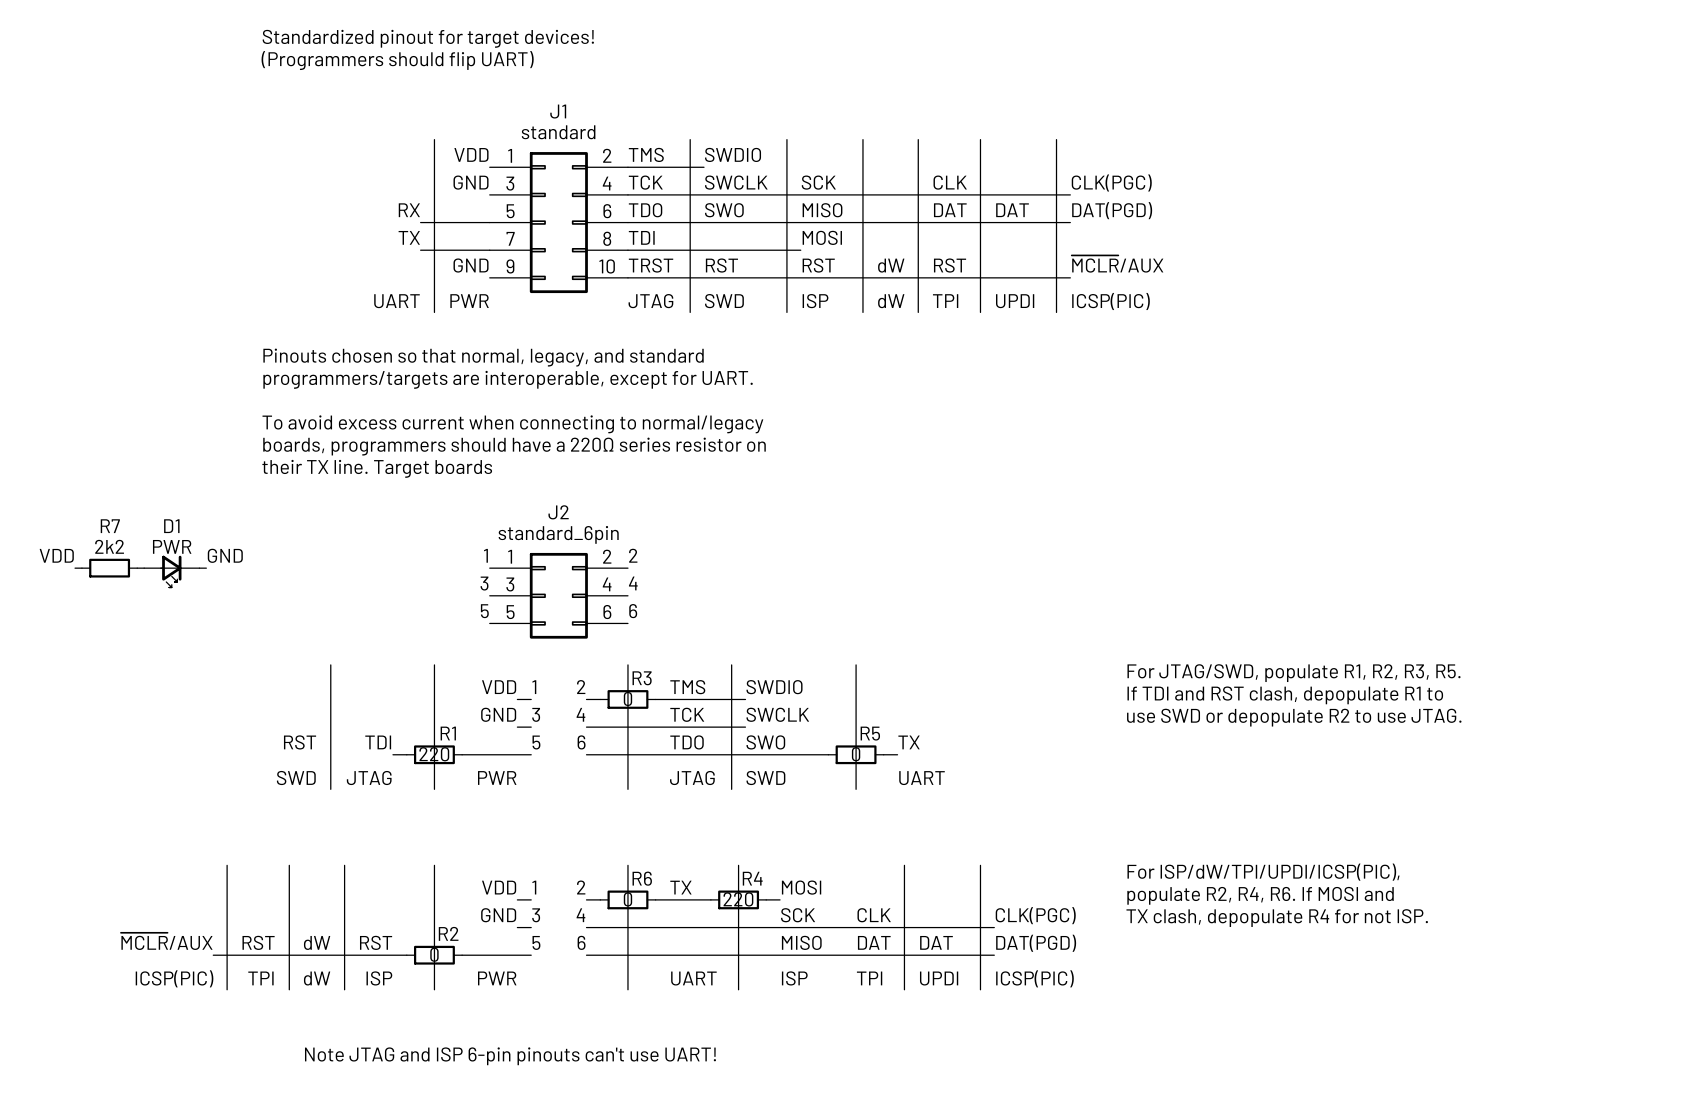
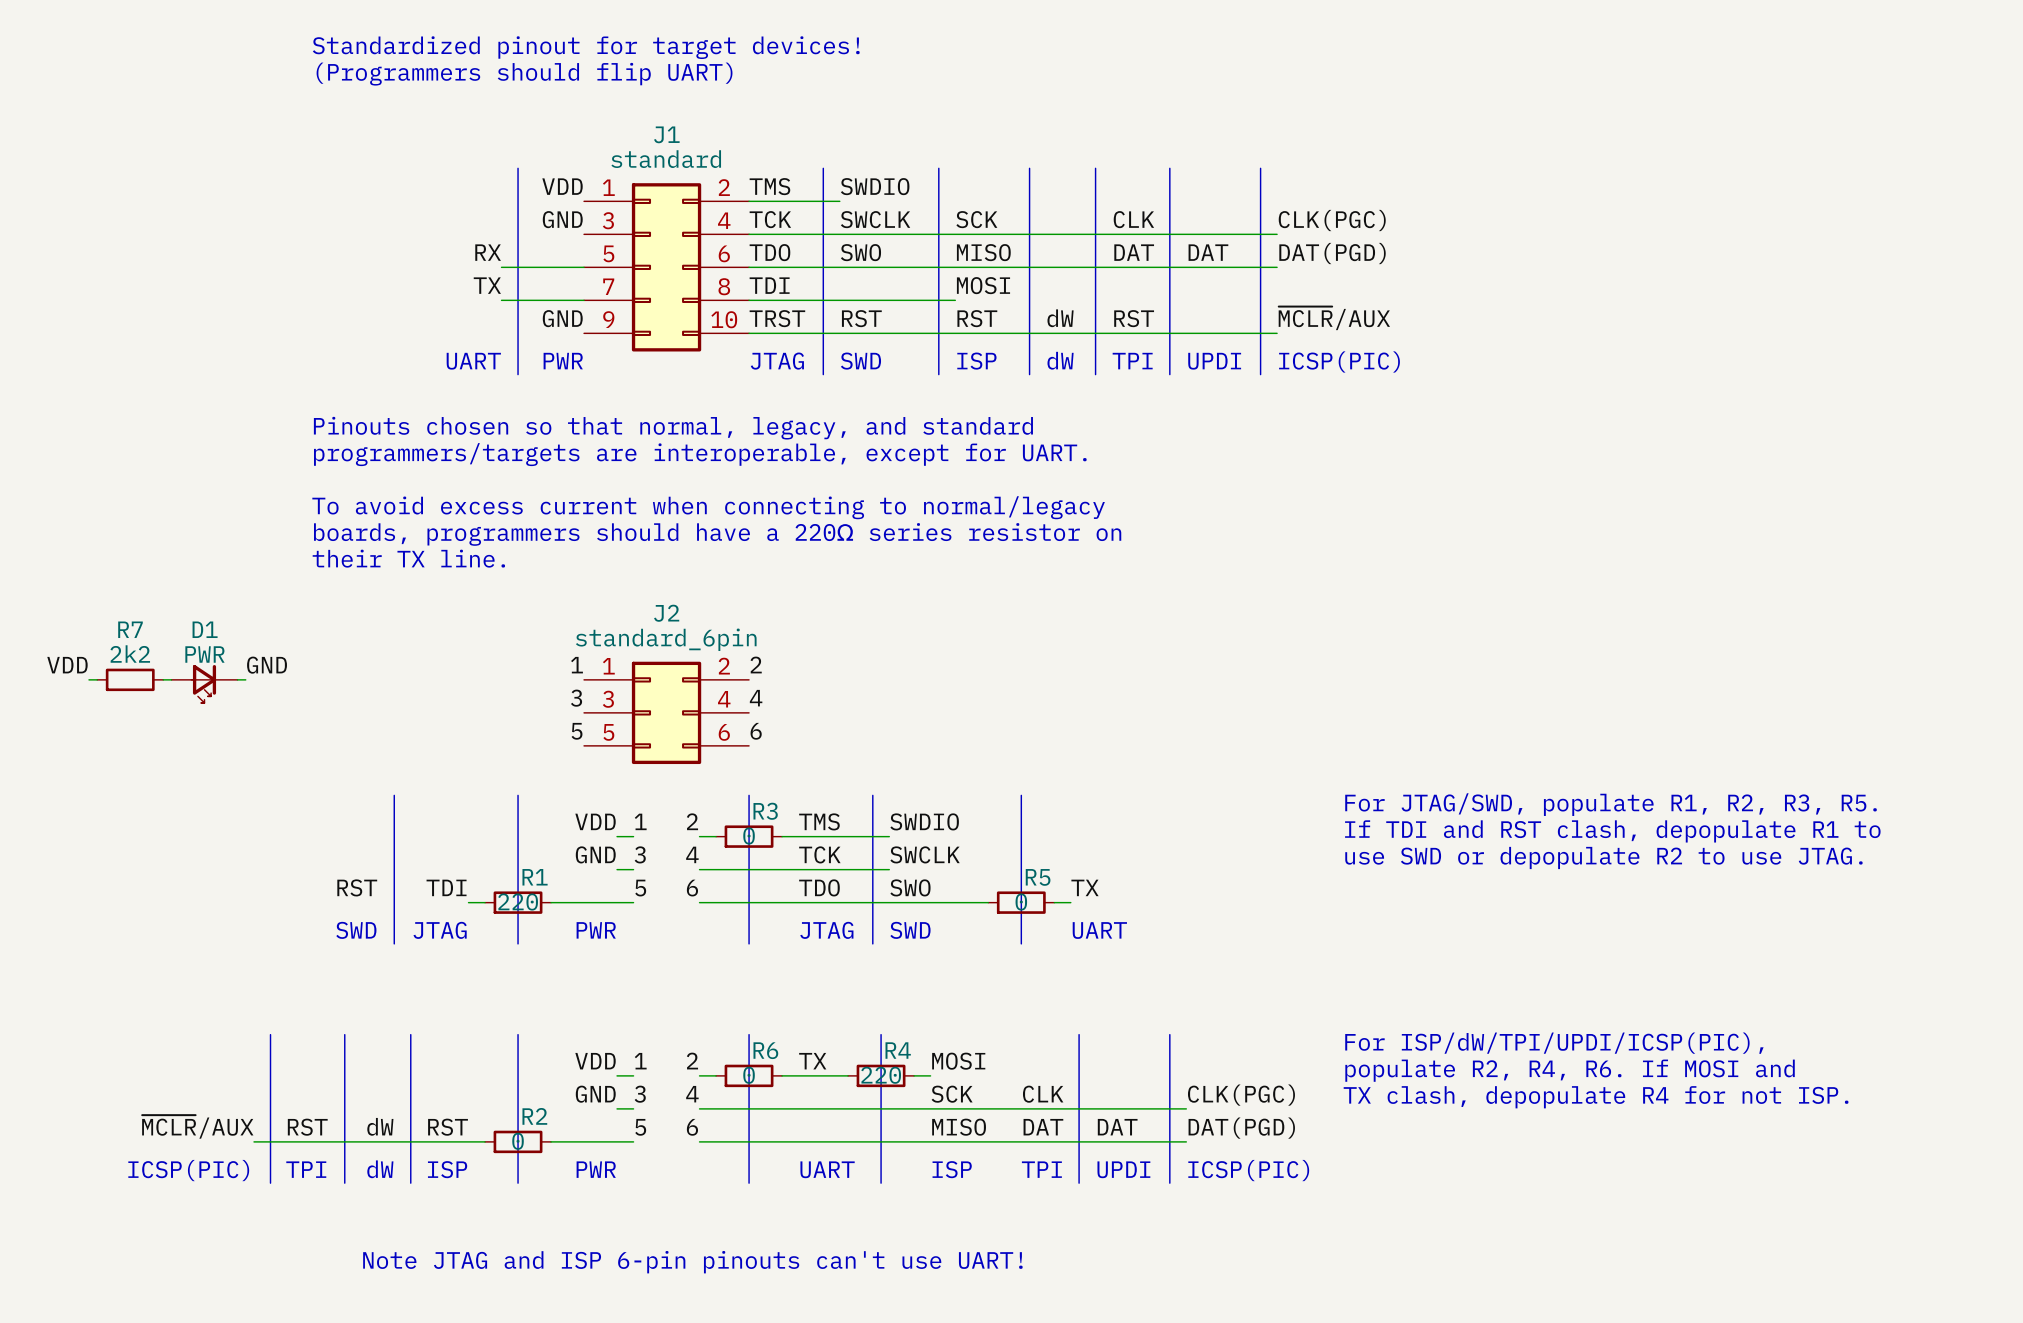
text: their TX line. Target boards (377, 468) -> their TX line. (408, 558)

